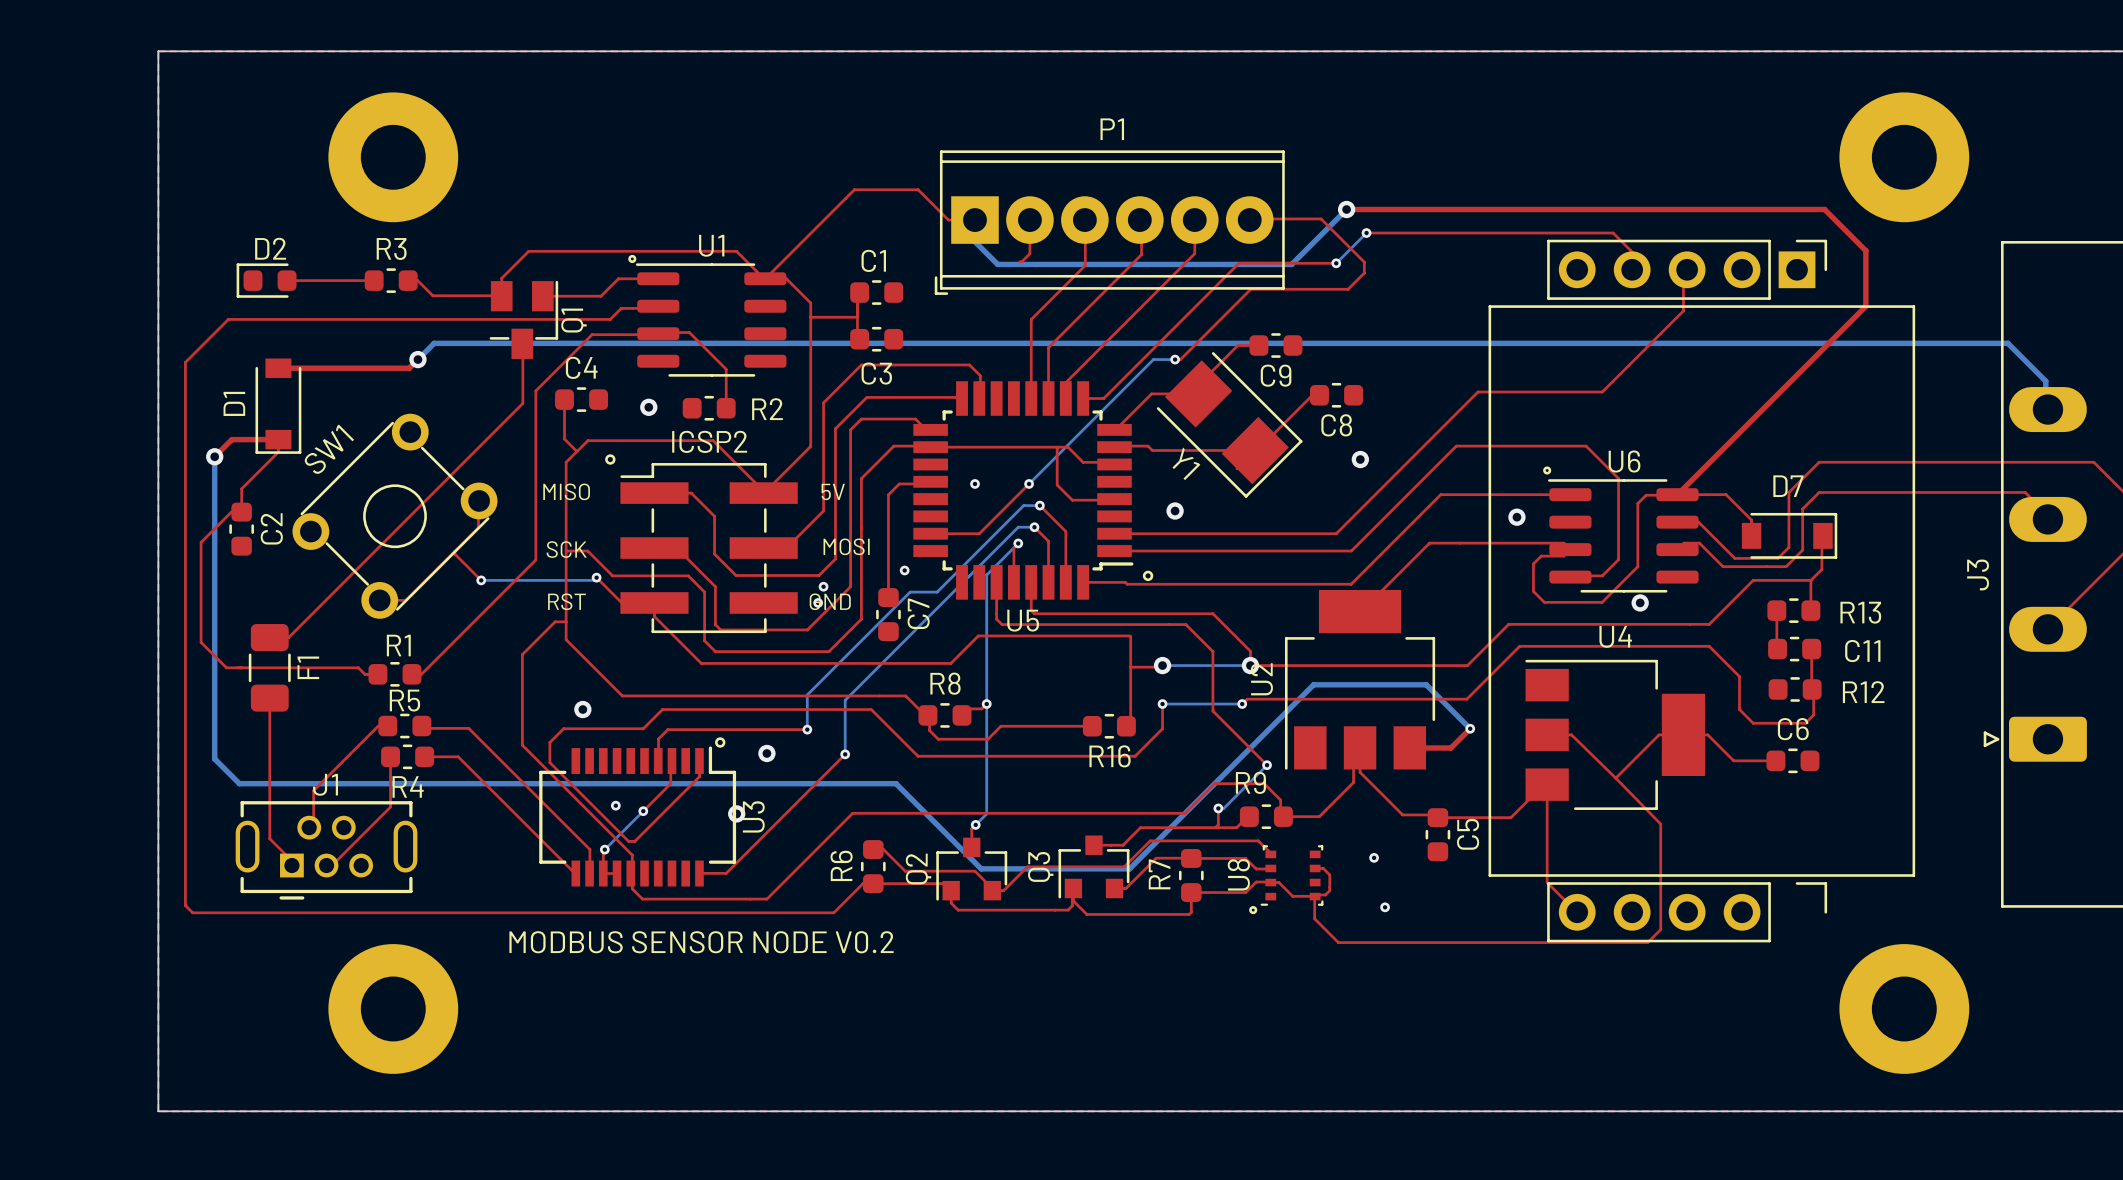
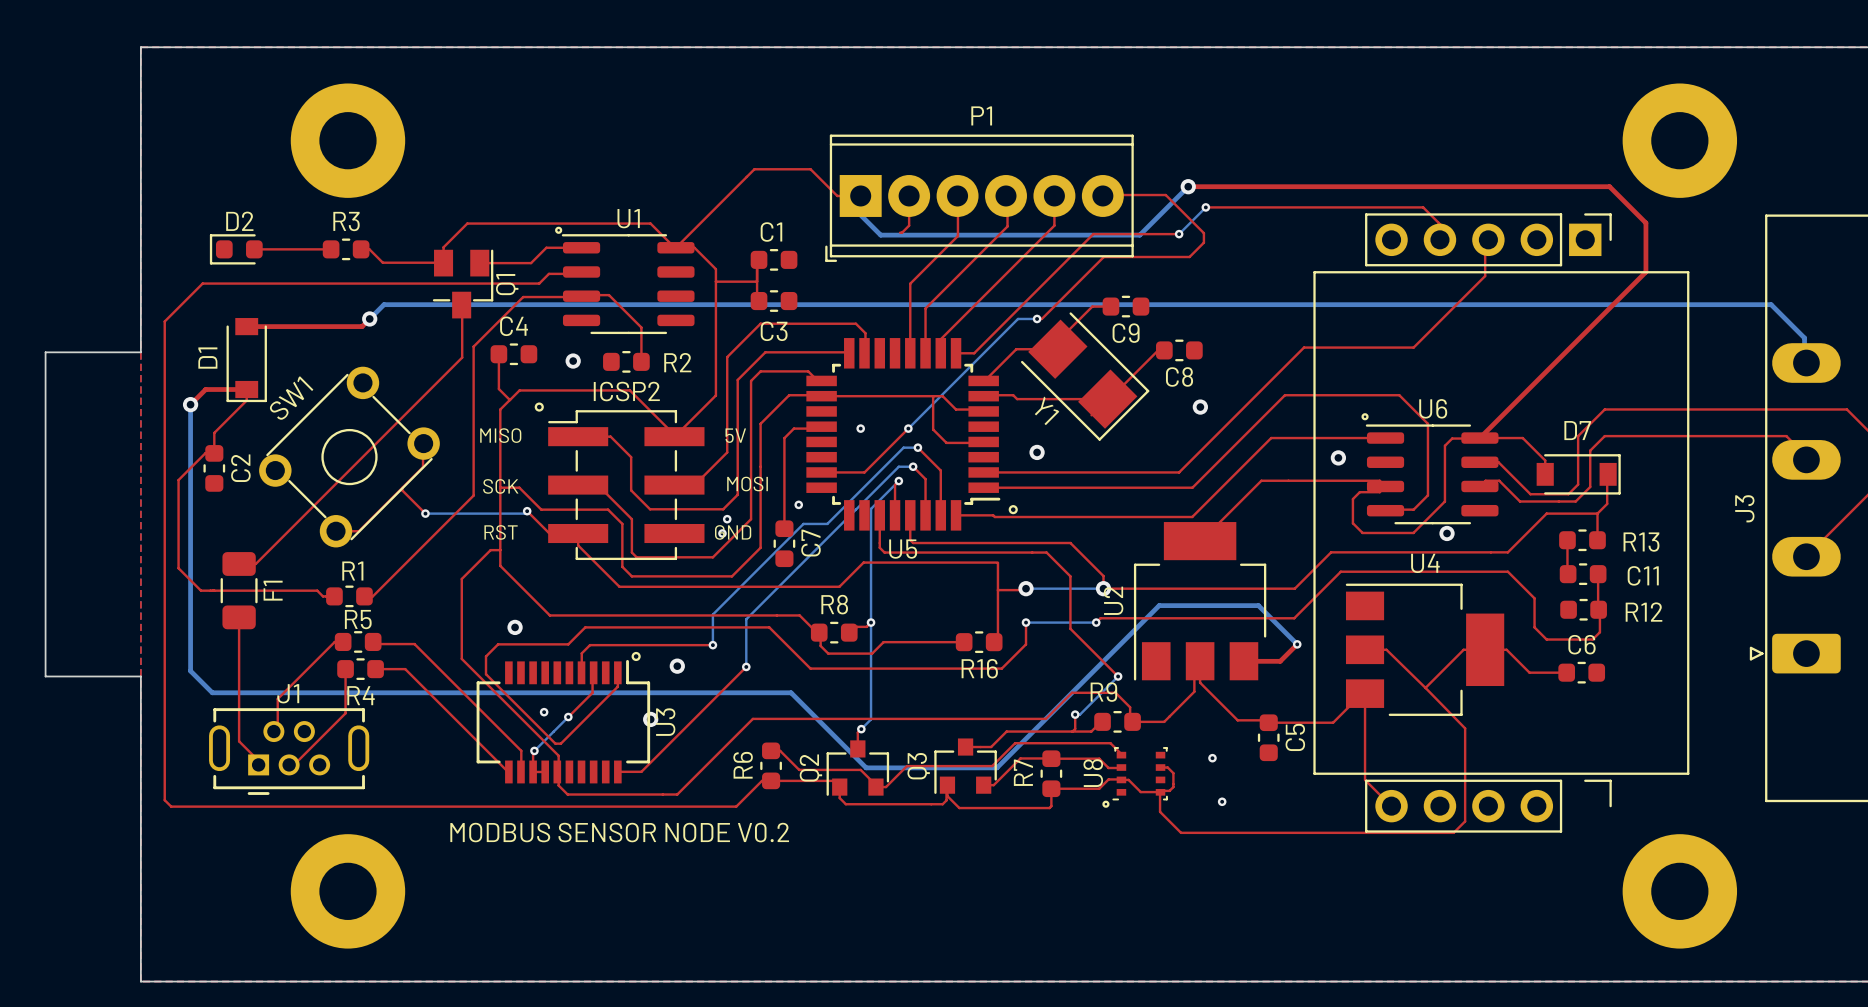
board edge: (158, 397) (158, 765) -> (140, 352) (45, 352) (45, 676) (140, 676)

